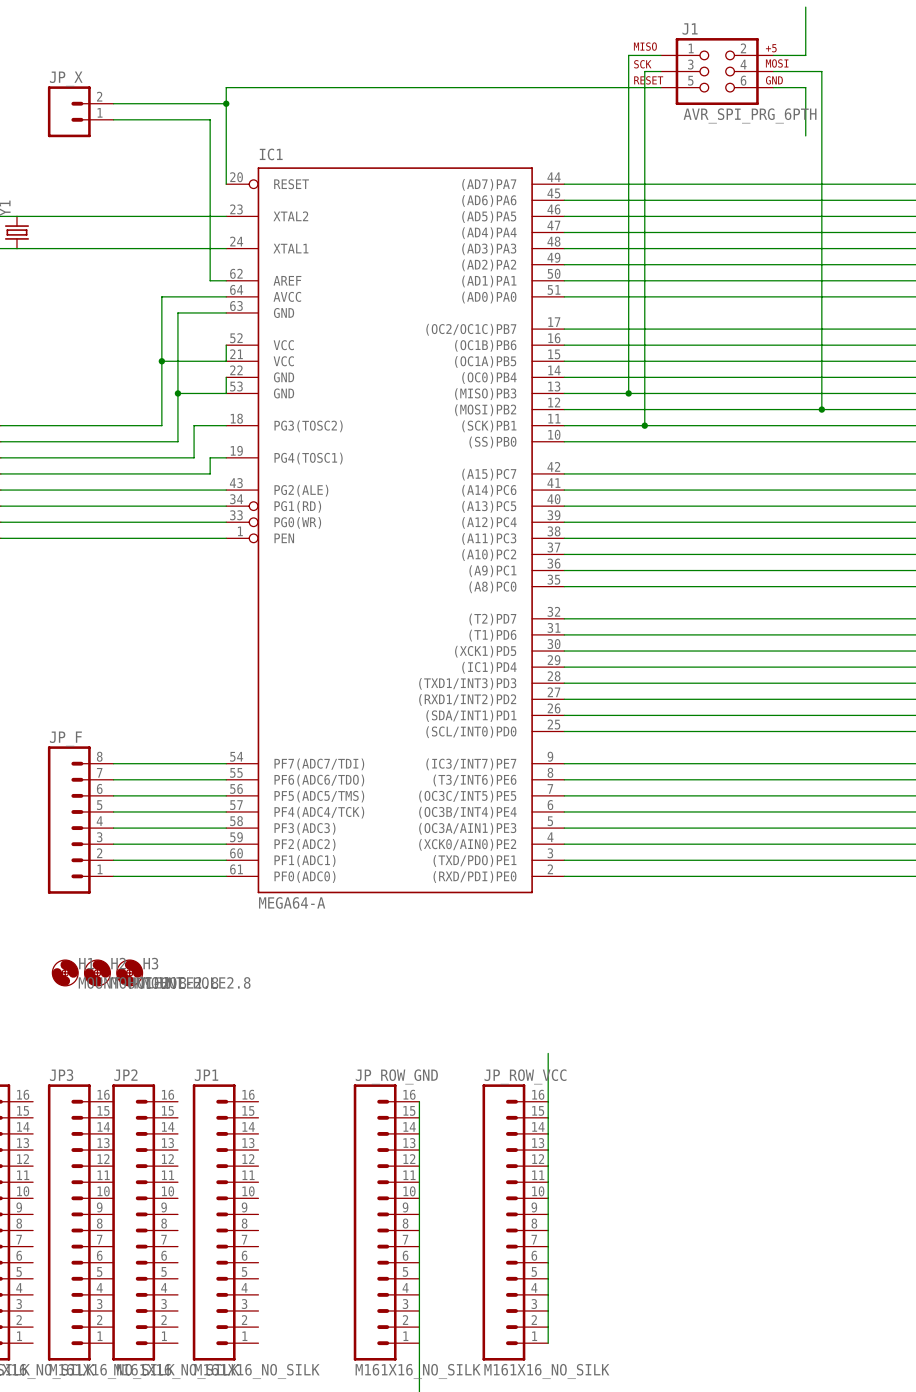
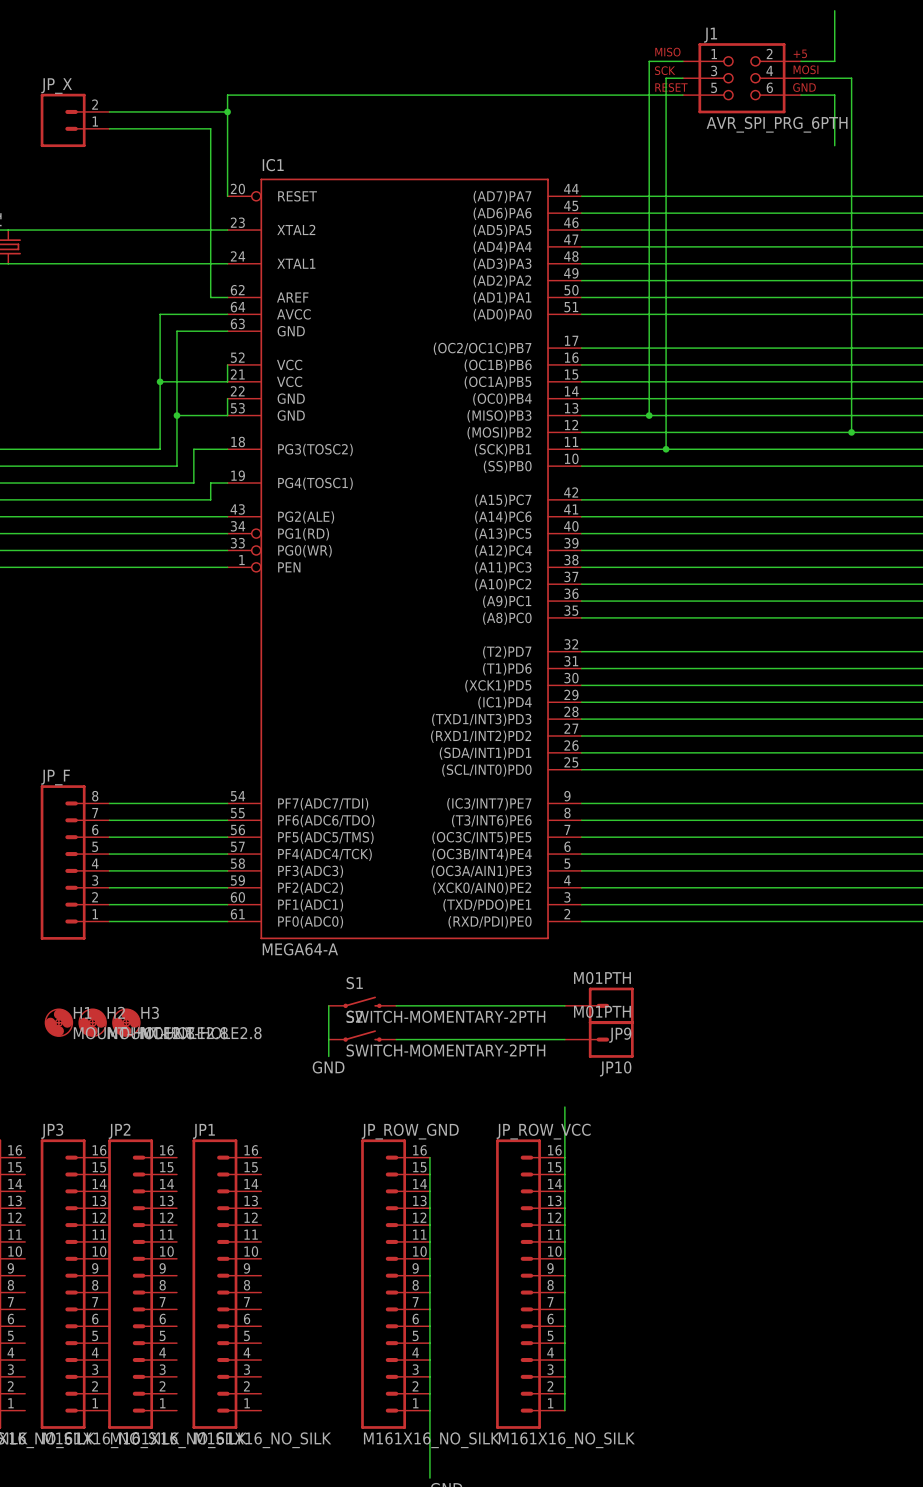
S1: none -> SWITCH-MOMENTARY-2PTH (362, 1002)
wire: none -> (328, 1005) (328, 1056)
wire: none -> (396, 1005) (564, 1005)
JP9: none -> M01PTH (599, 1005)
part: none -> SWITCH-MOMENTARY-2PTH (362, 1036)
wire: none -> (396, 1039) (564, 1039)
JP10: none -> M01PTH (599, 1039)
label: none -> GND (328, 1067)

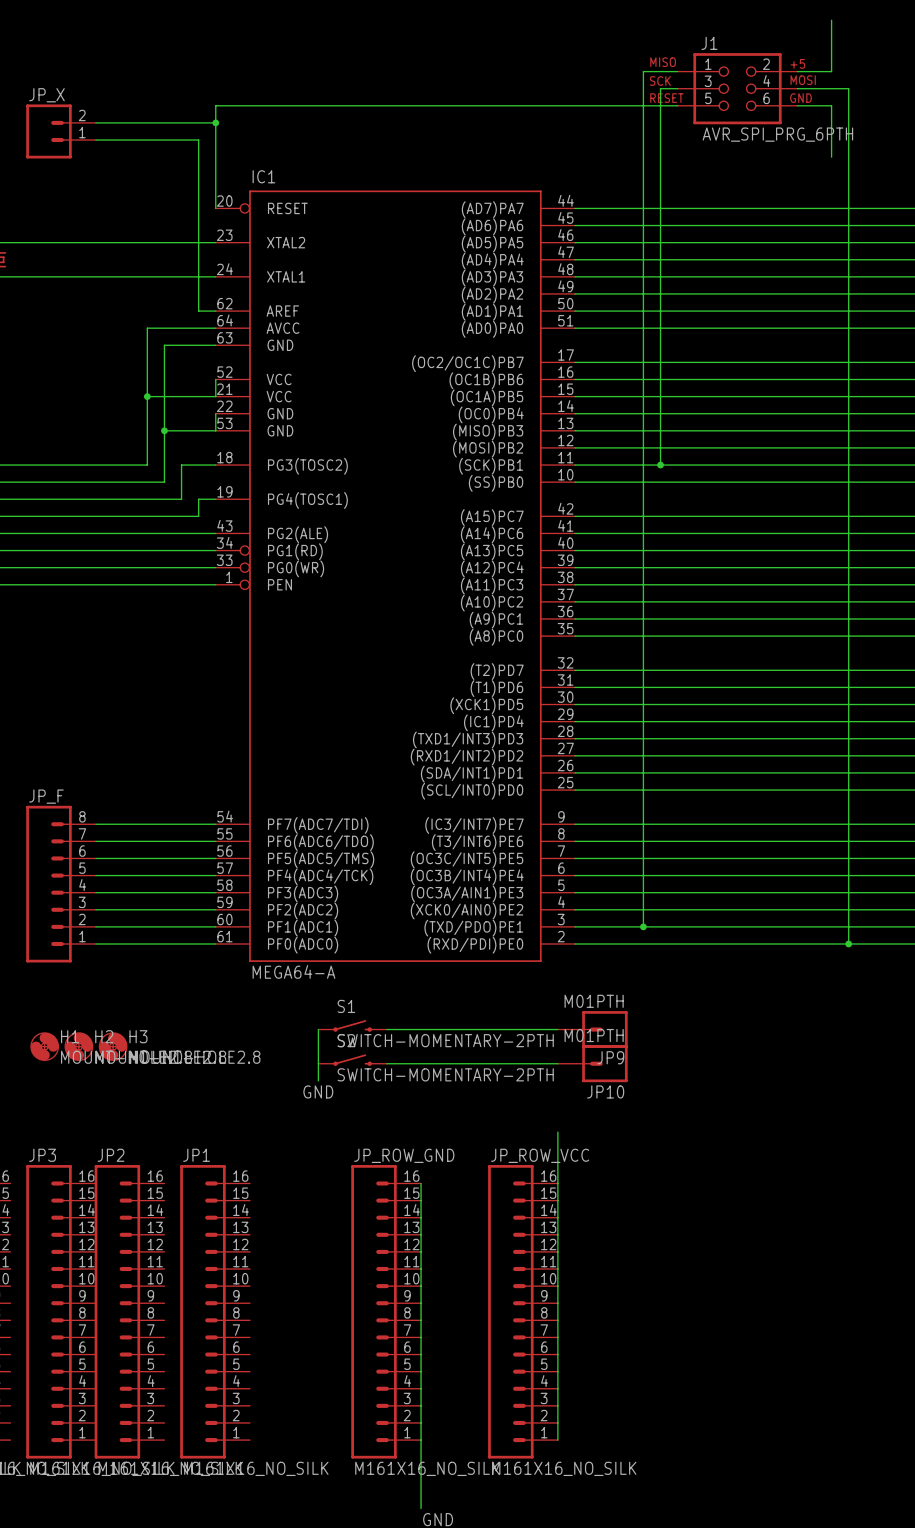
wire: none -> (643, 430) (643, 926)
junction: (649, 415) -> none
wire: none -> (848, 447) (848, 944)
junction: (851, 432) -> none
junction: none -> (643, 926)
junction: none -> (848, 944)

